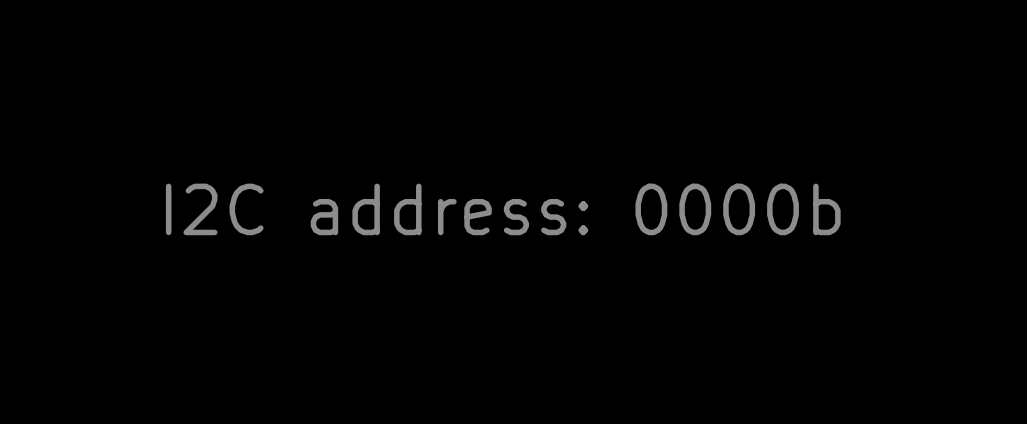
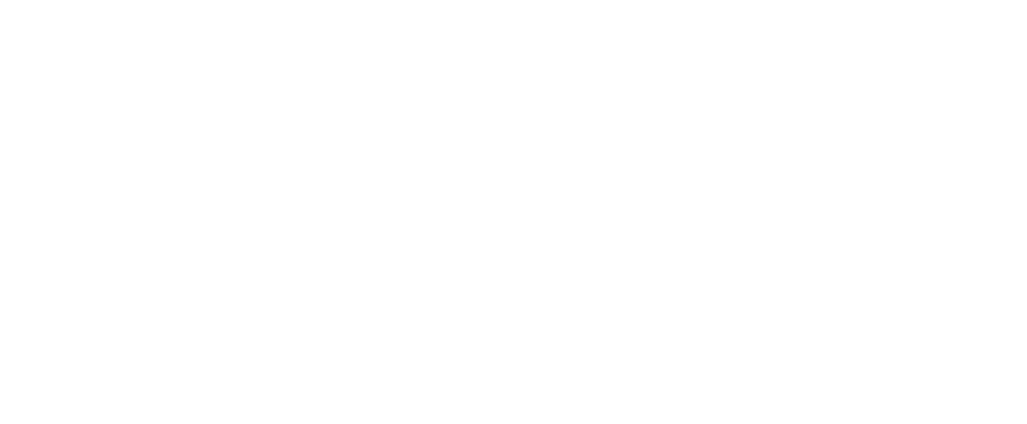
text: I2C address: 0000b (503, 209) -> none

